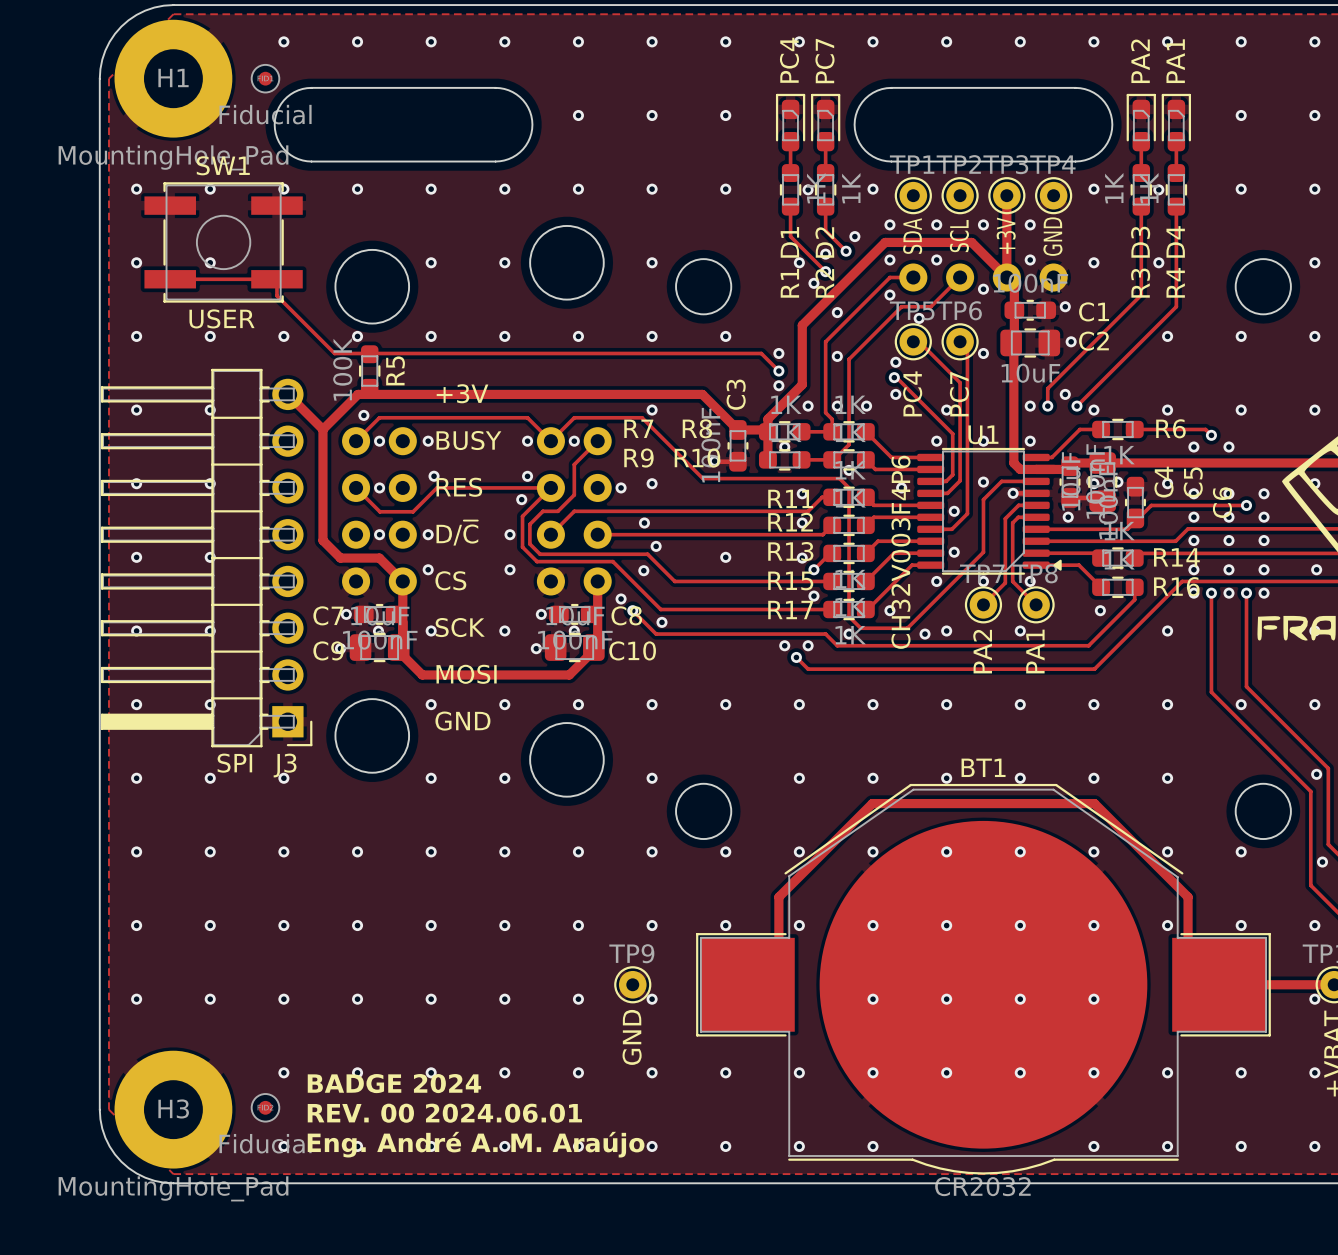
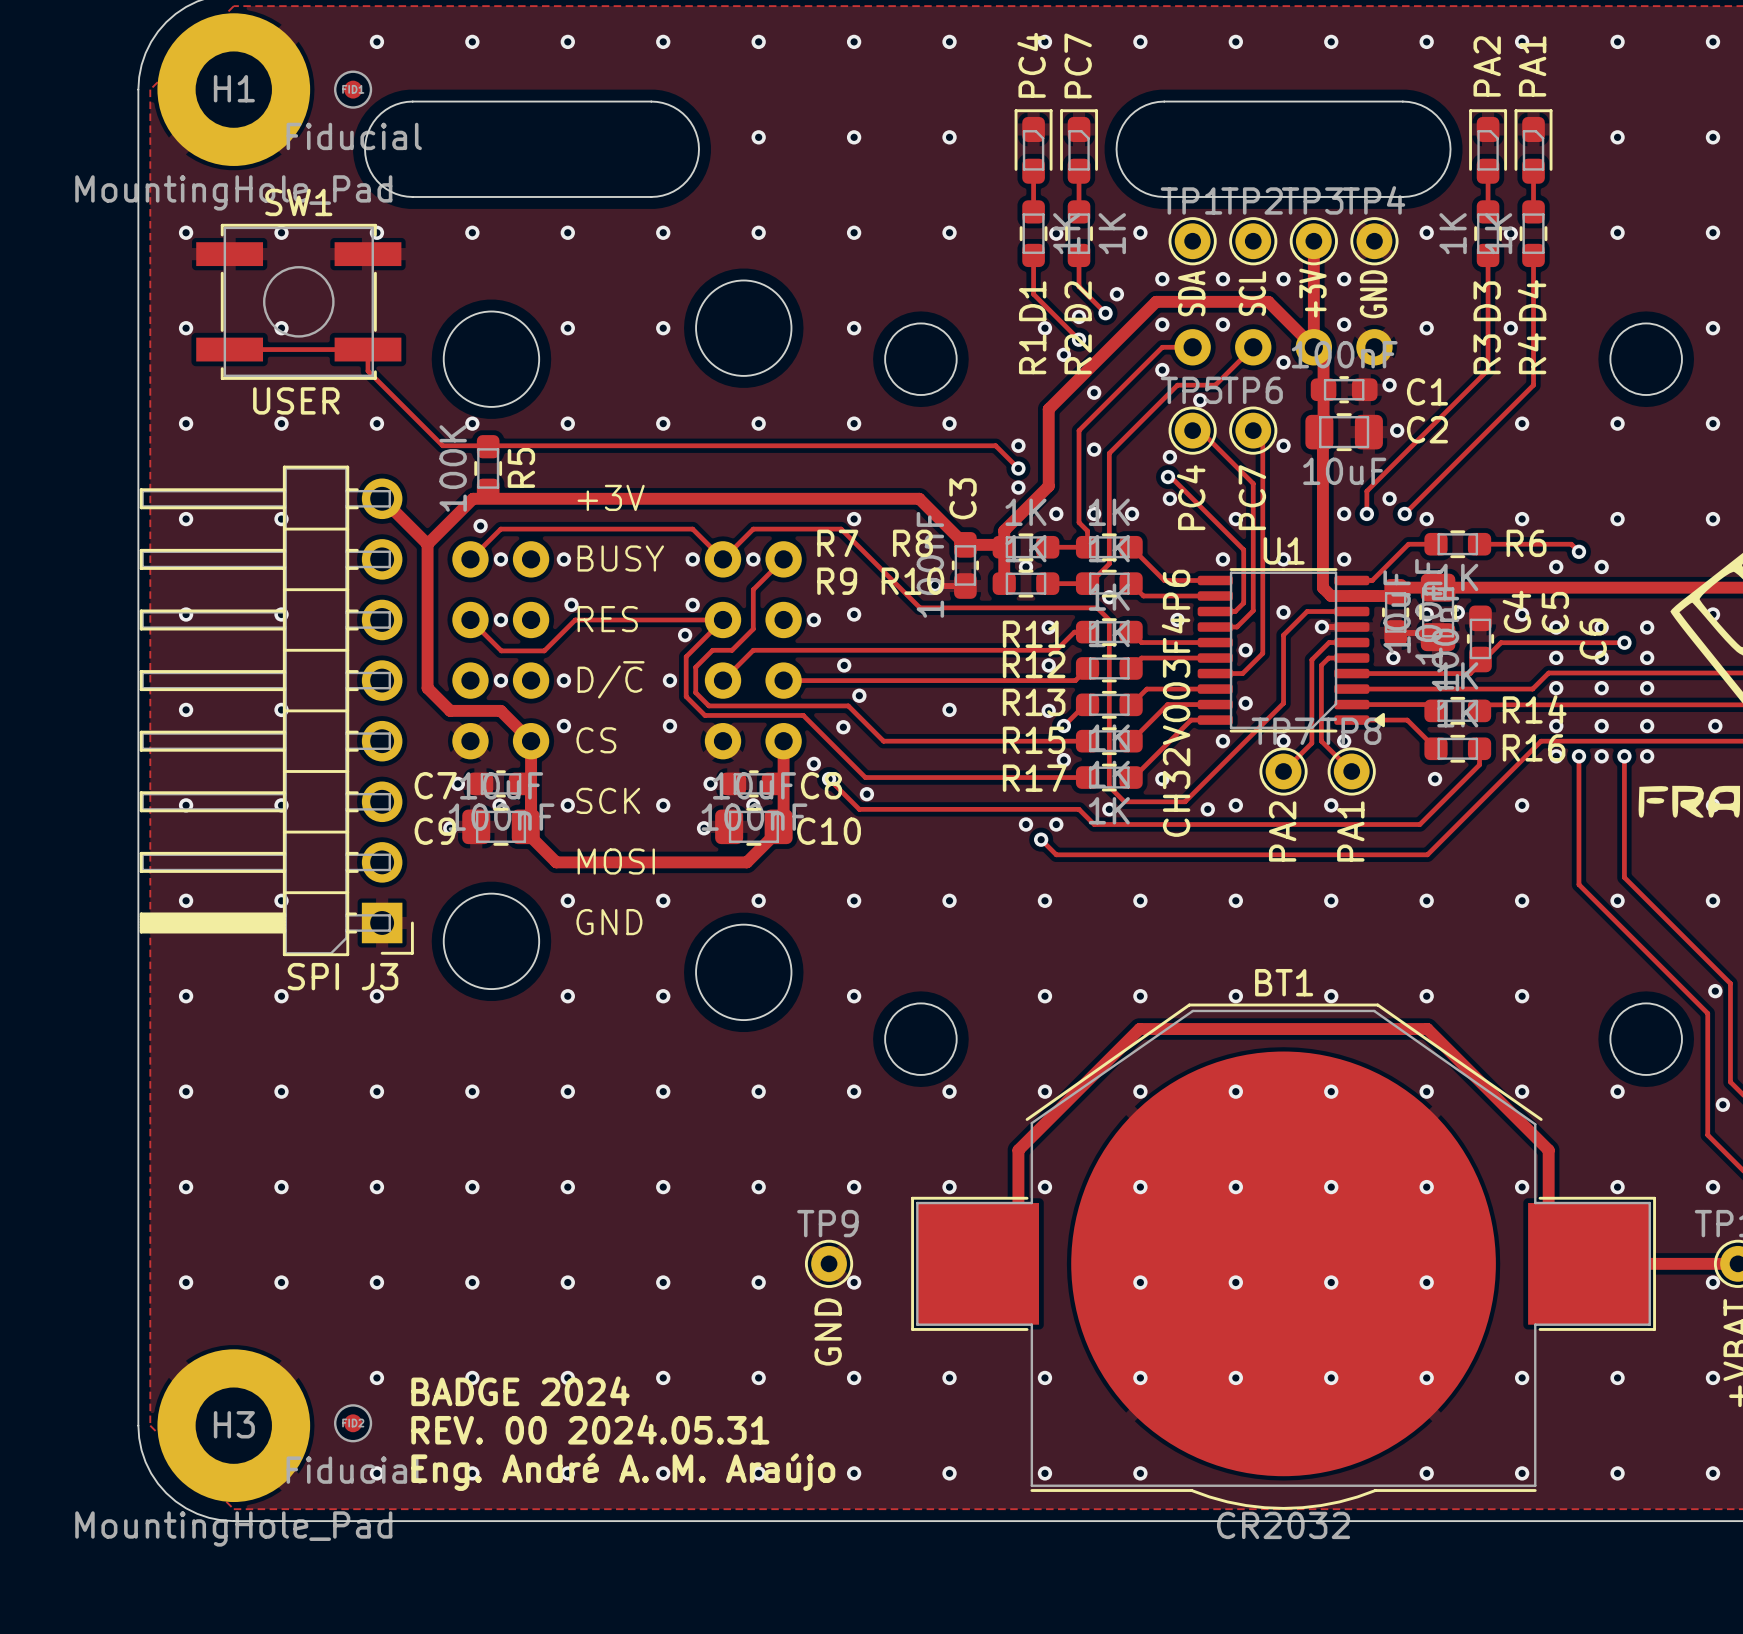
text: REV. 00 2024.06.01 (444, 1113) -> REV. 00 2024.05.31 (590, 1429)

